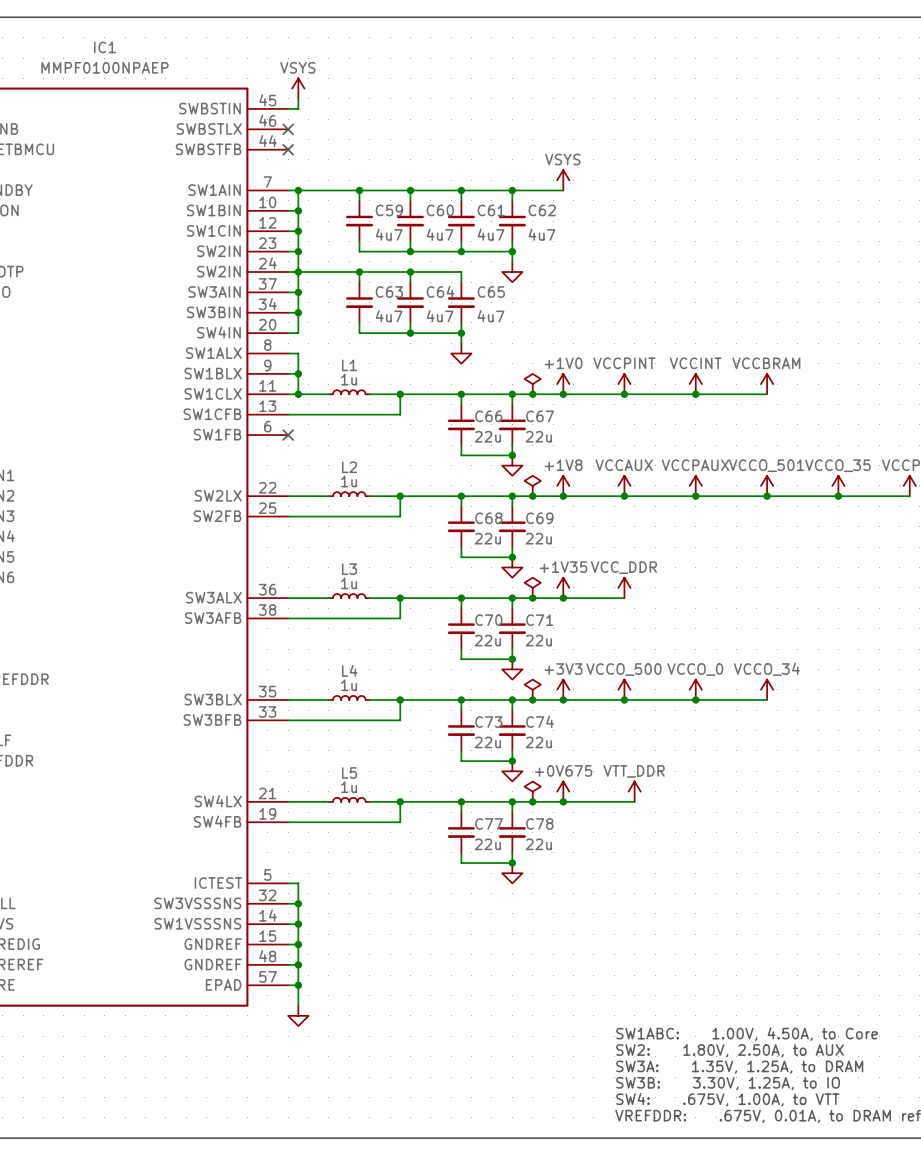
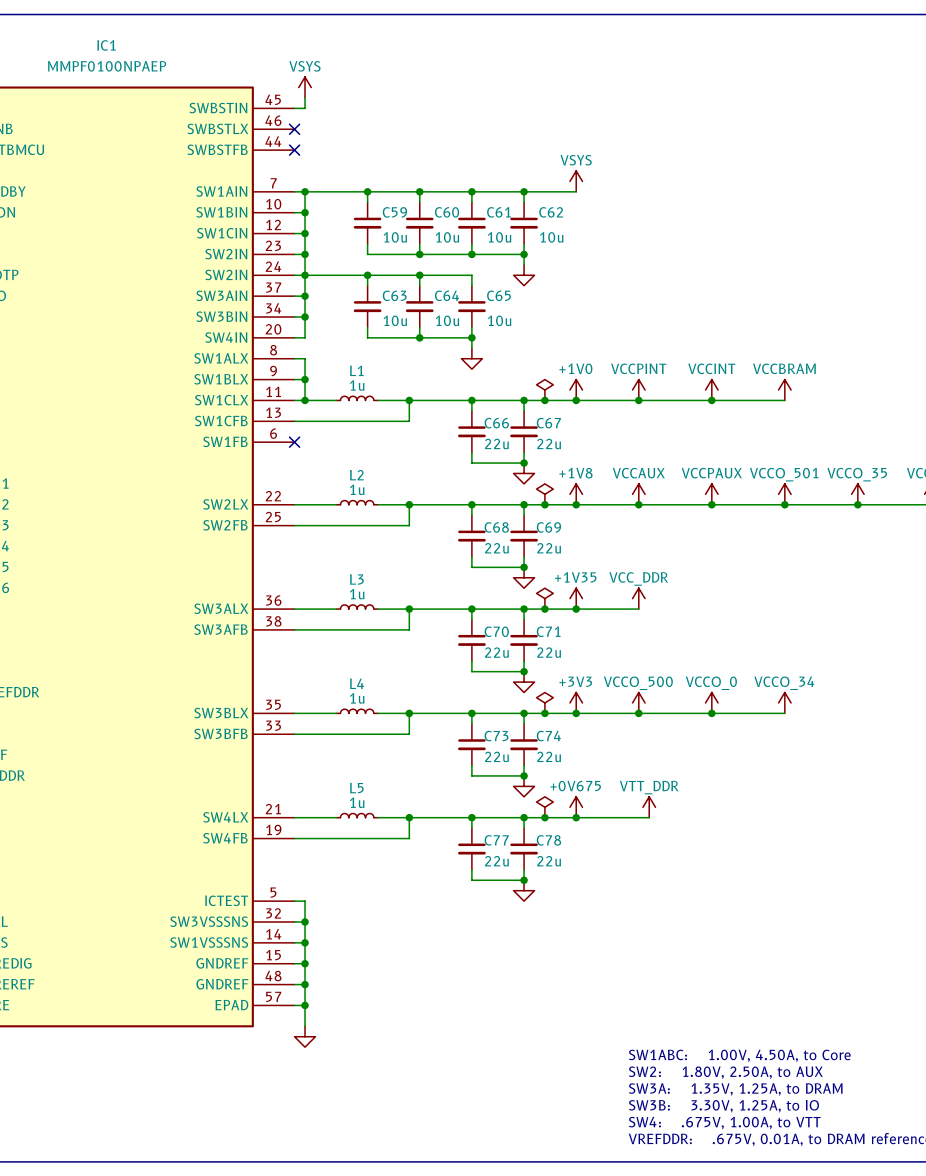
C59 value: 4u7 (389, 234) -> 10u (395, 237)
C60 value: 4u7 (440, 234) -> 10u (447, 237)
C61 value: 4u7 (491, 234) -> 10u (499, 237)
C62 value: 4u7 (541, 234) -> 10u (551, 237)
C63 value: 4u7 (389, 316) -> 10u (395, 320)
C64 value: 4u7 (440, 316) -> 10u (447, 320)
C65 value: 4u7 (491, 316) -> 10u (499, 320)

